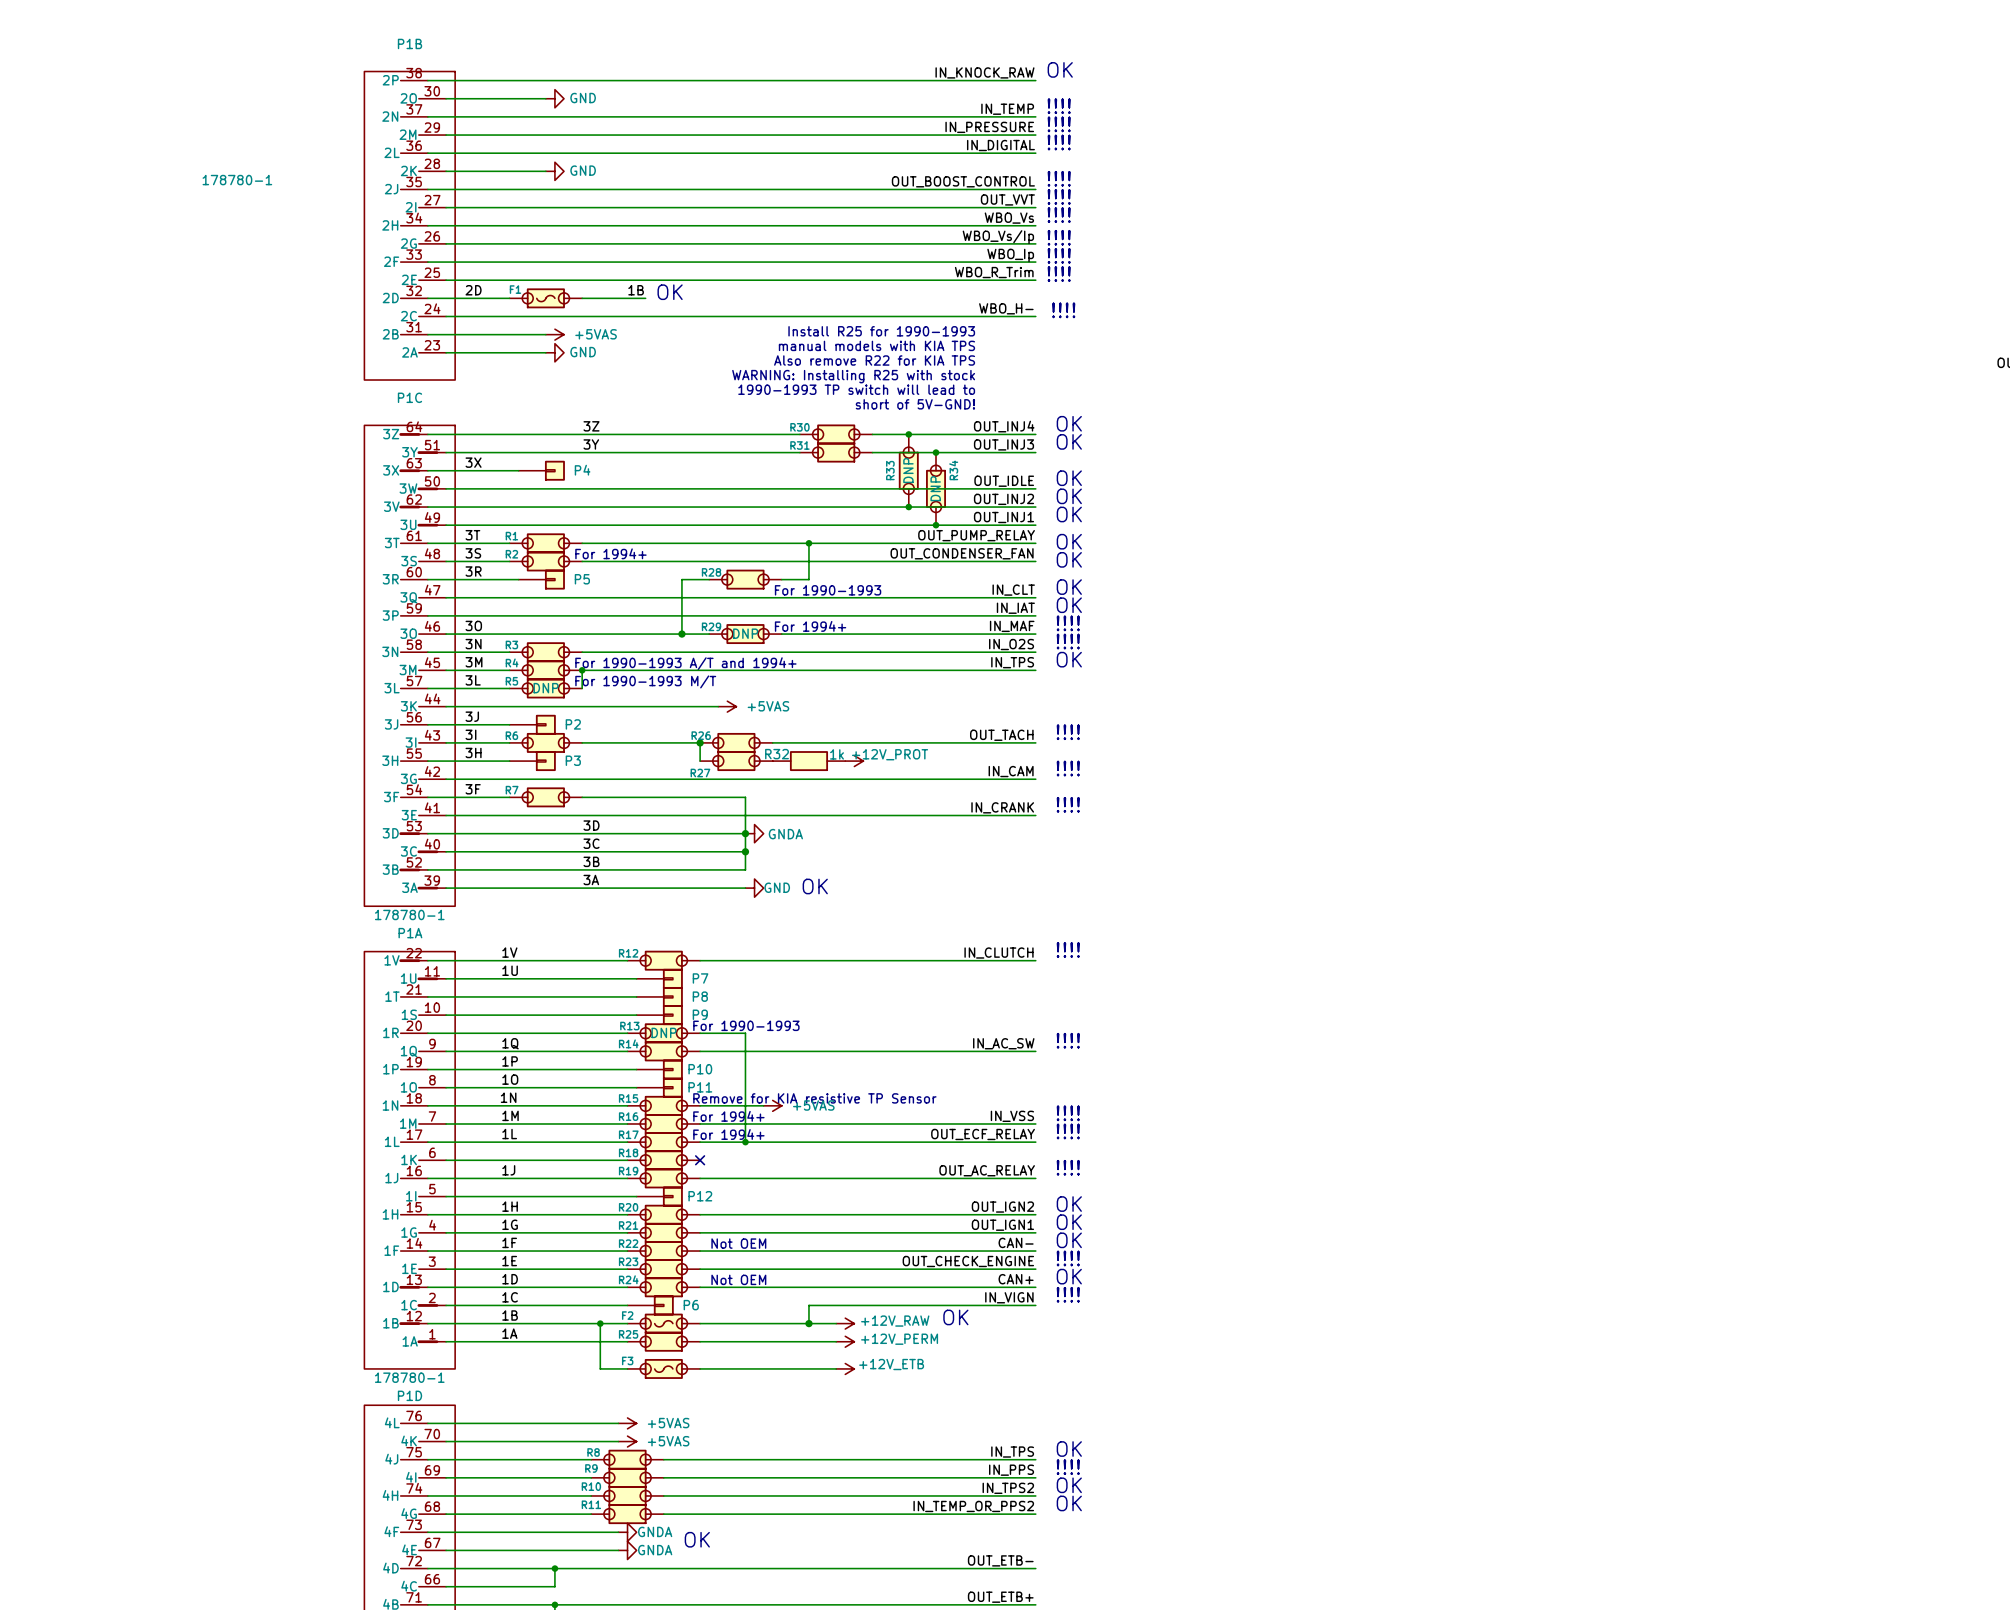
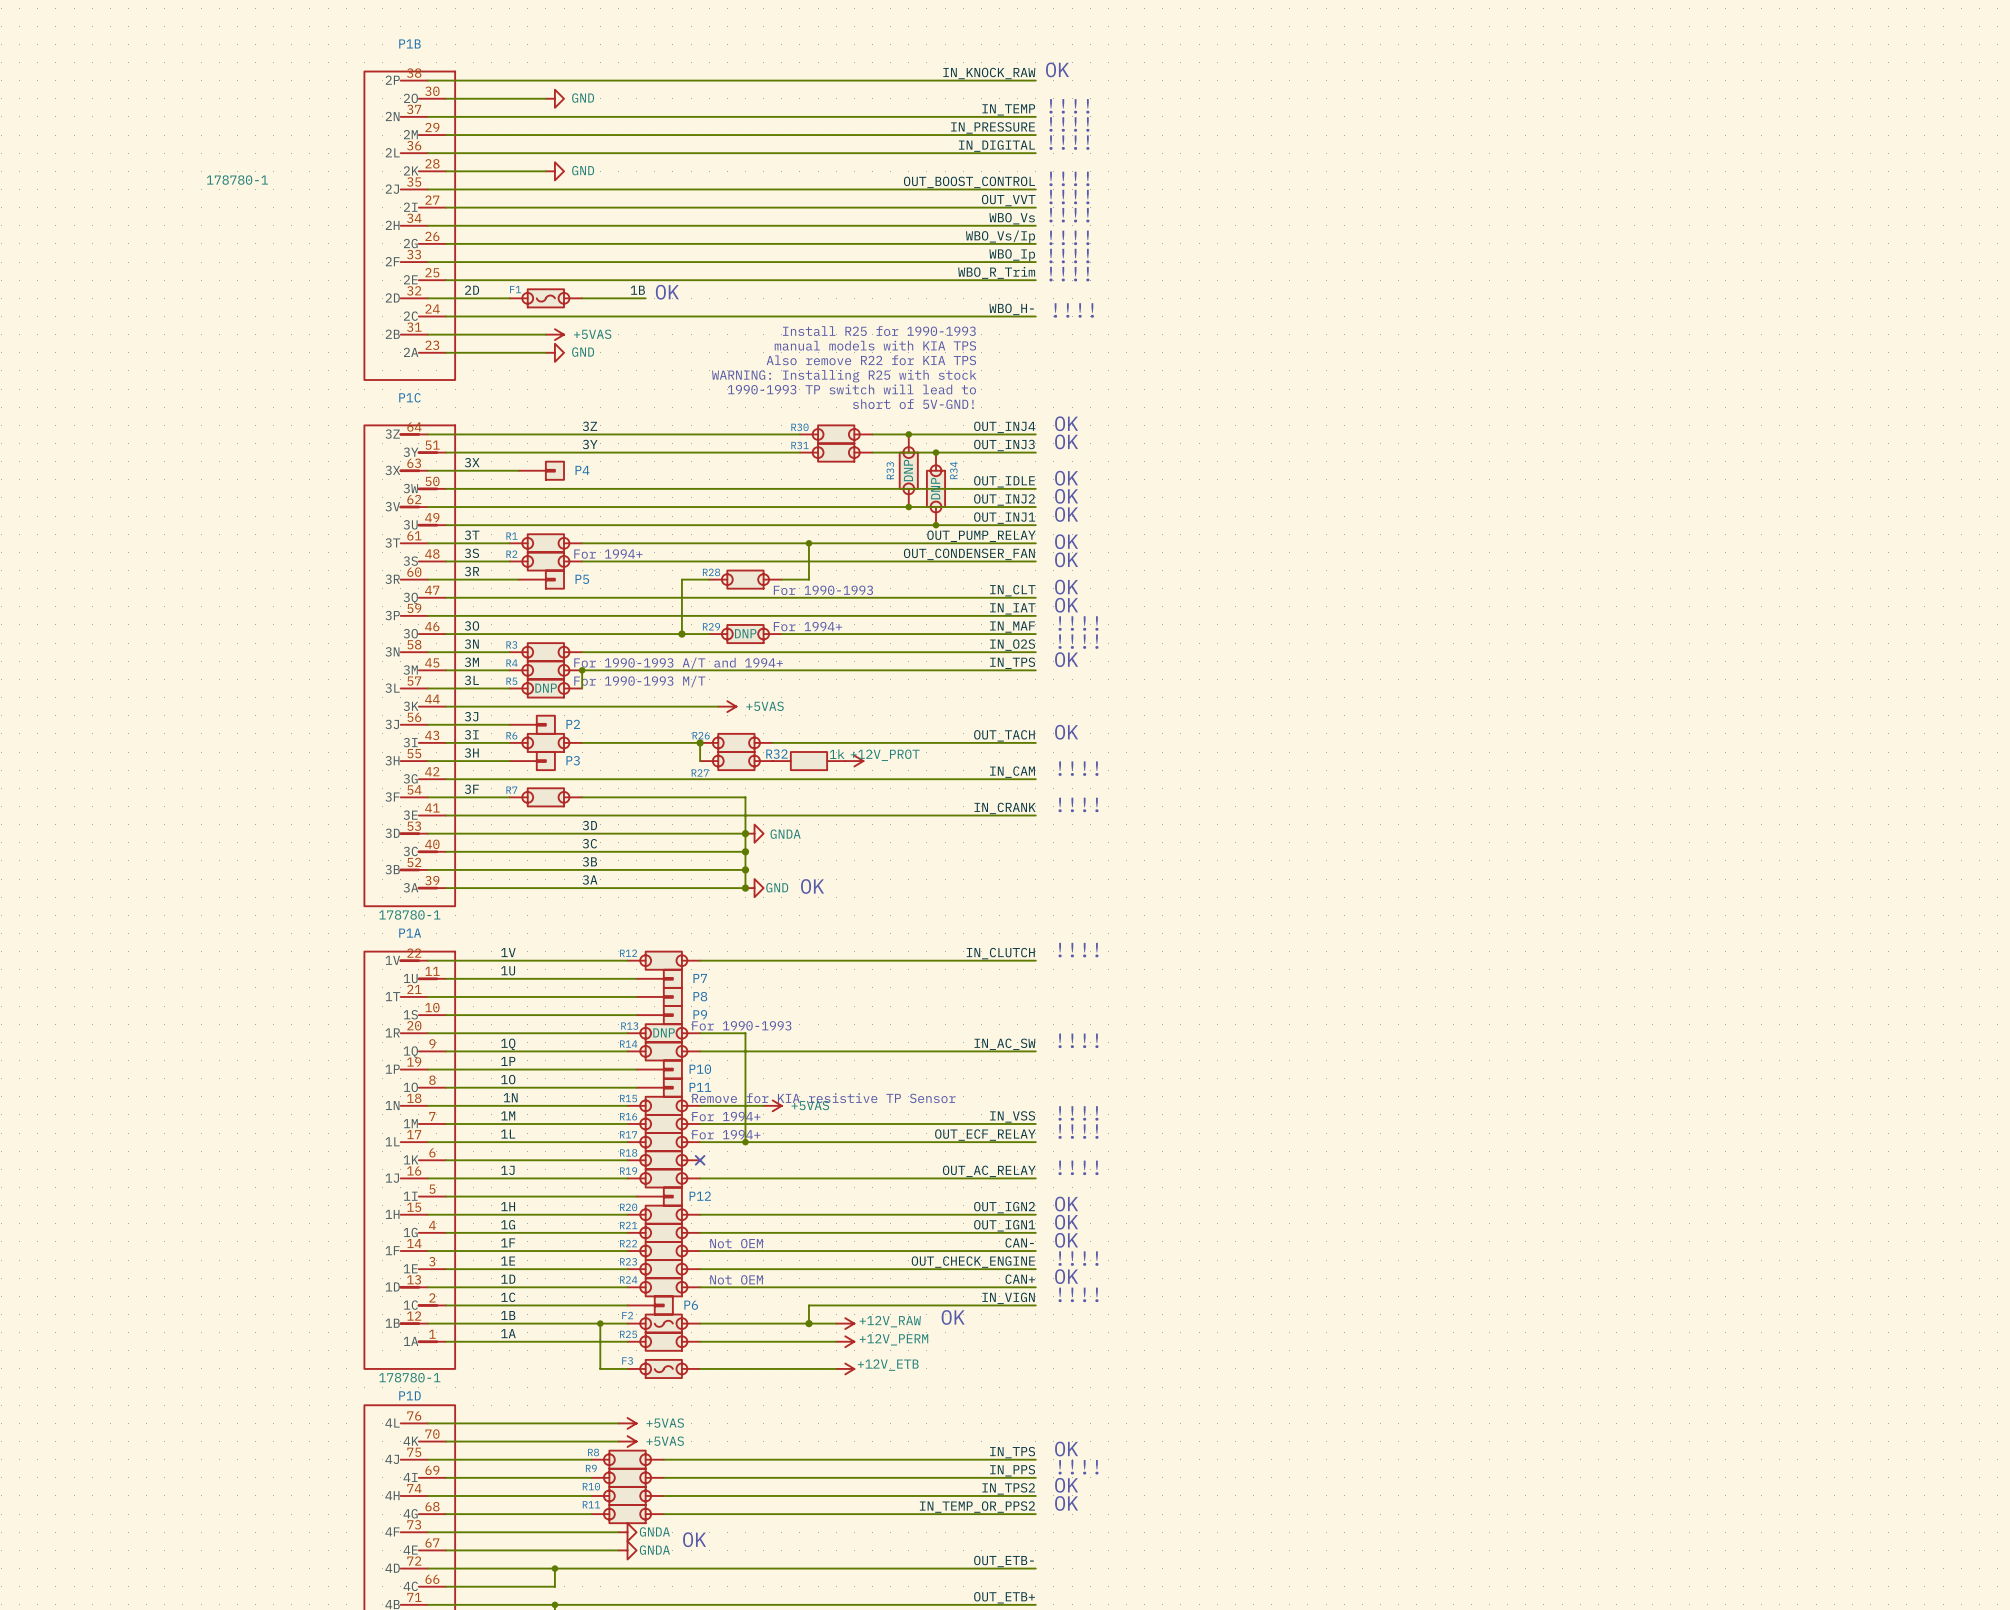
text: !!!! (1068, 732) -> OK (1066, 732)
wire: none -> (745, 869) (745, 888)
junction: none -> (745, 869)
junction: none -> (745, 888)

